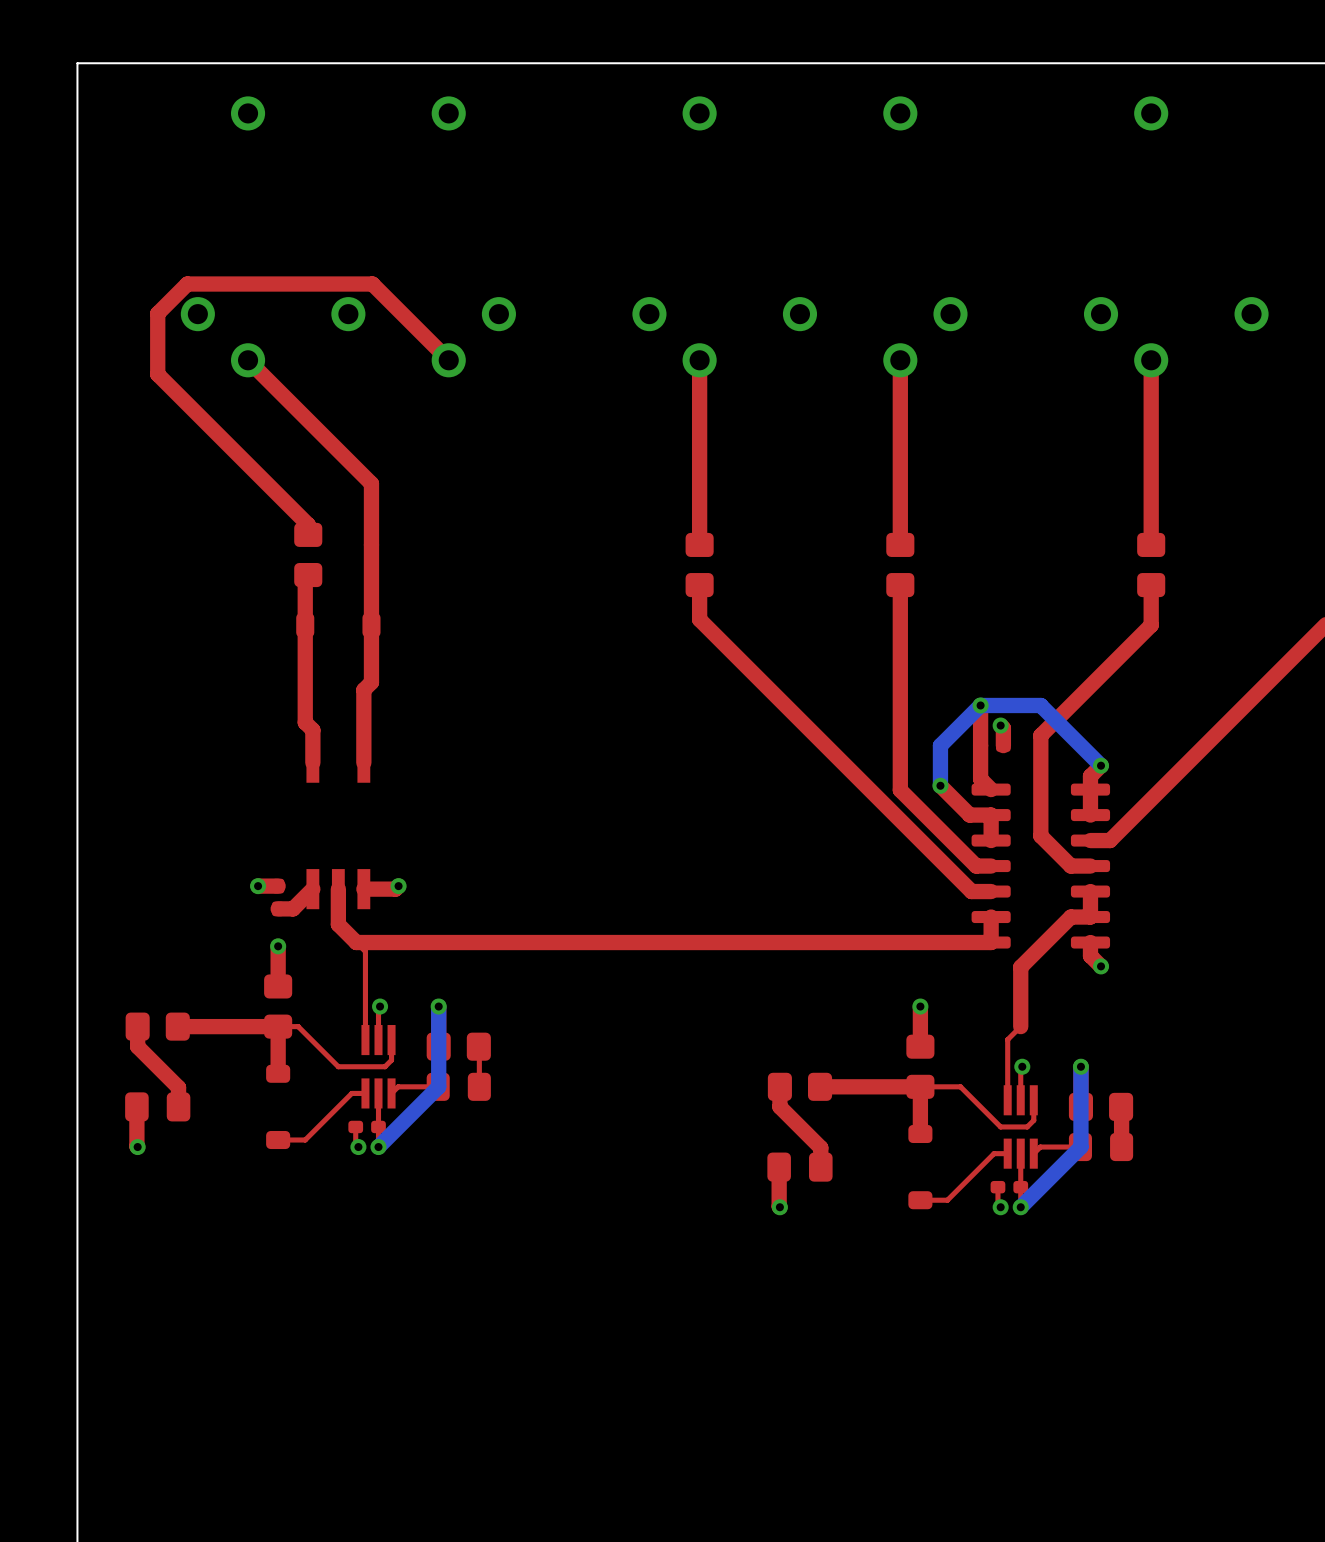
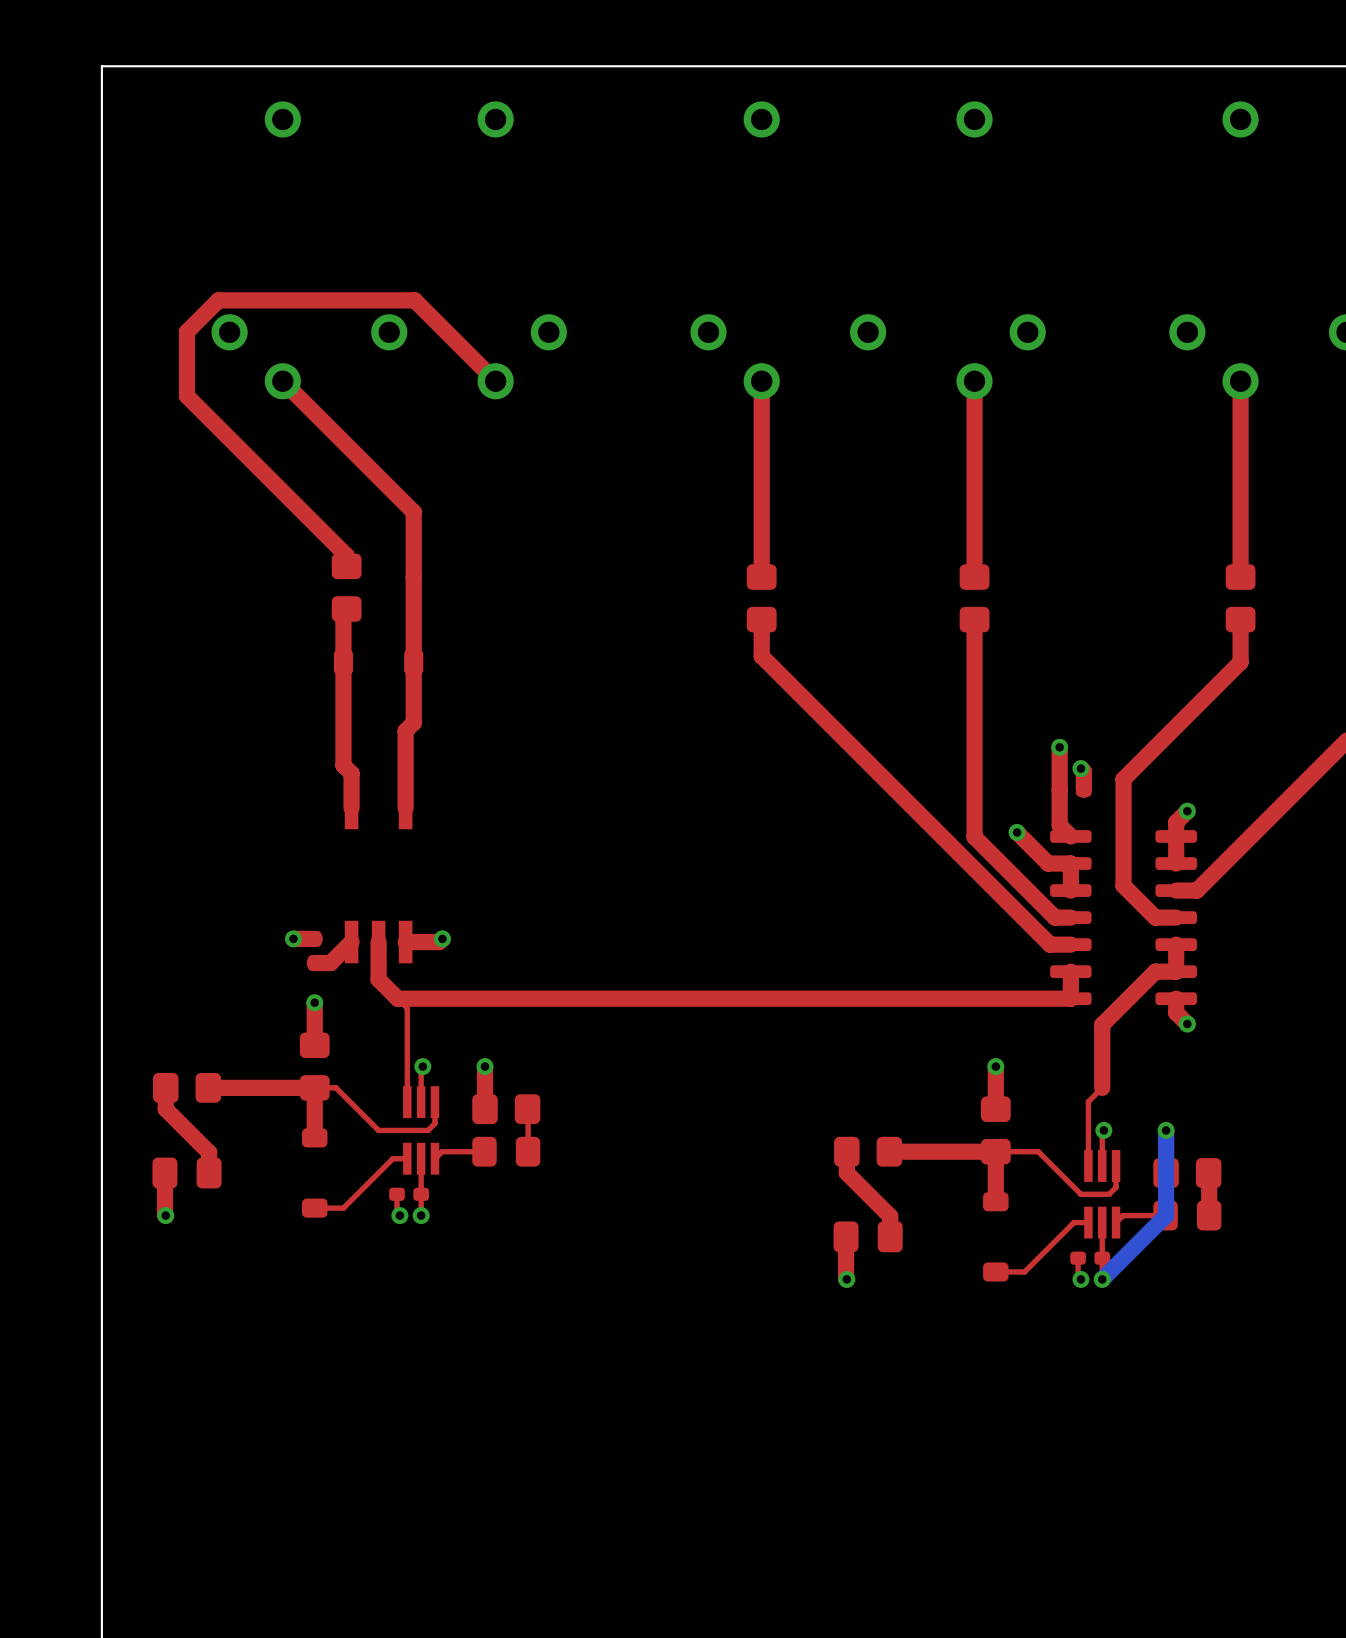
bottom track: (1101, 765) (1040, 705) (980, 705) (940, 745) (940, 785) -> none
bottom track: (438, 1006) (438, 1086) (378, 1147) -> none

